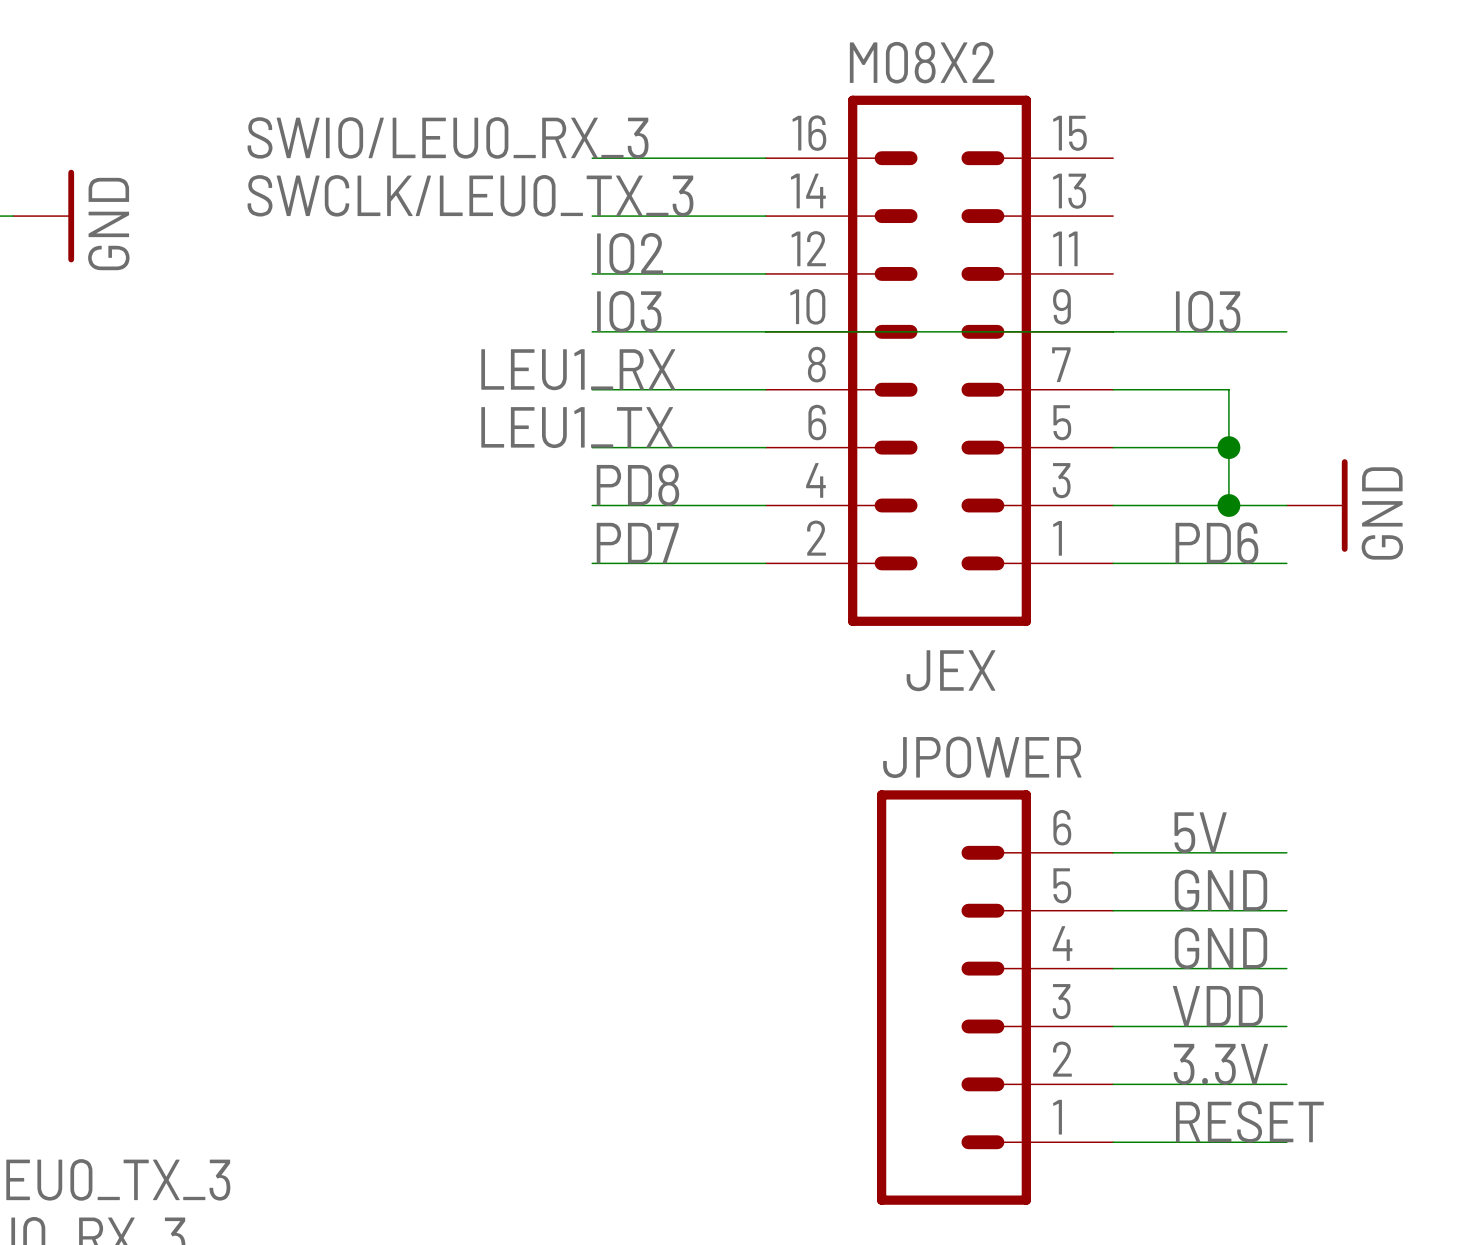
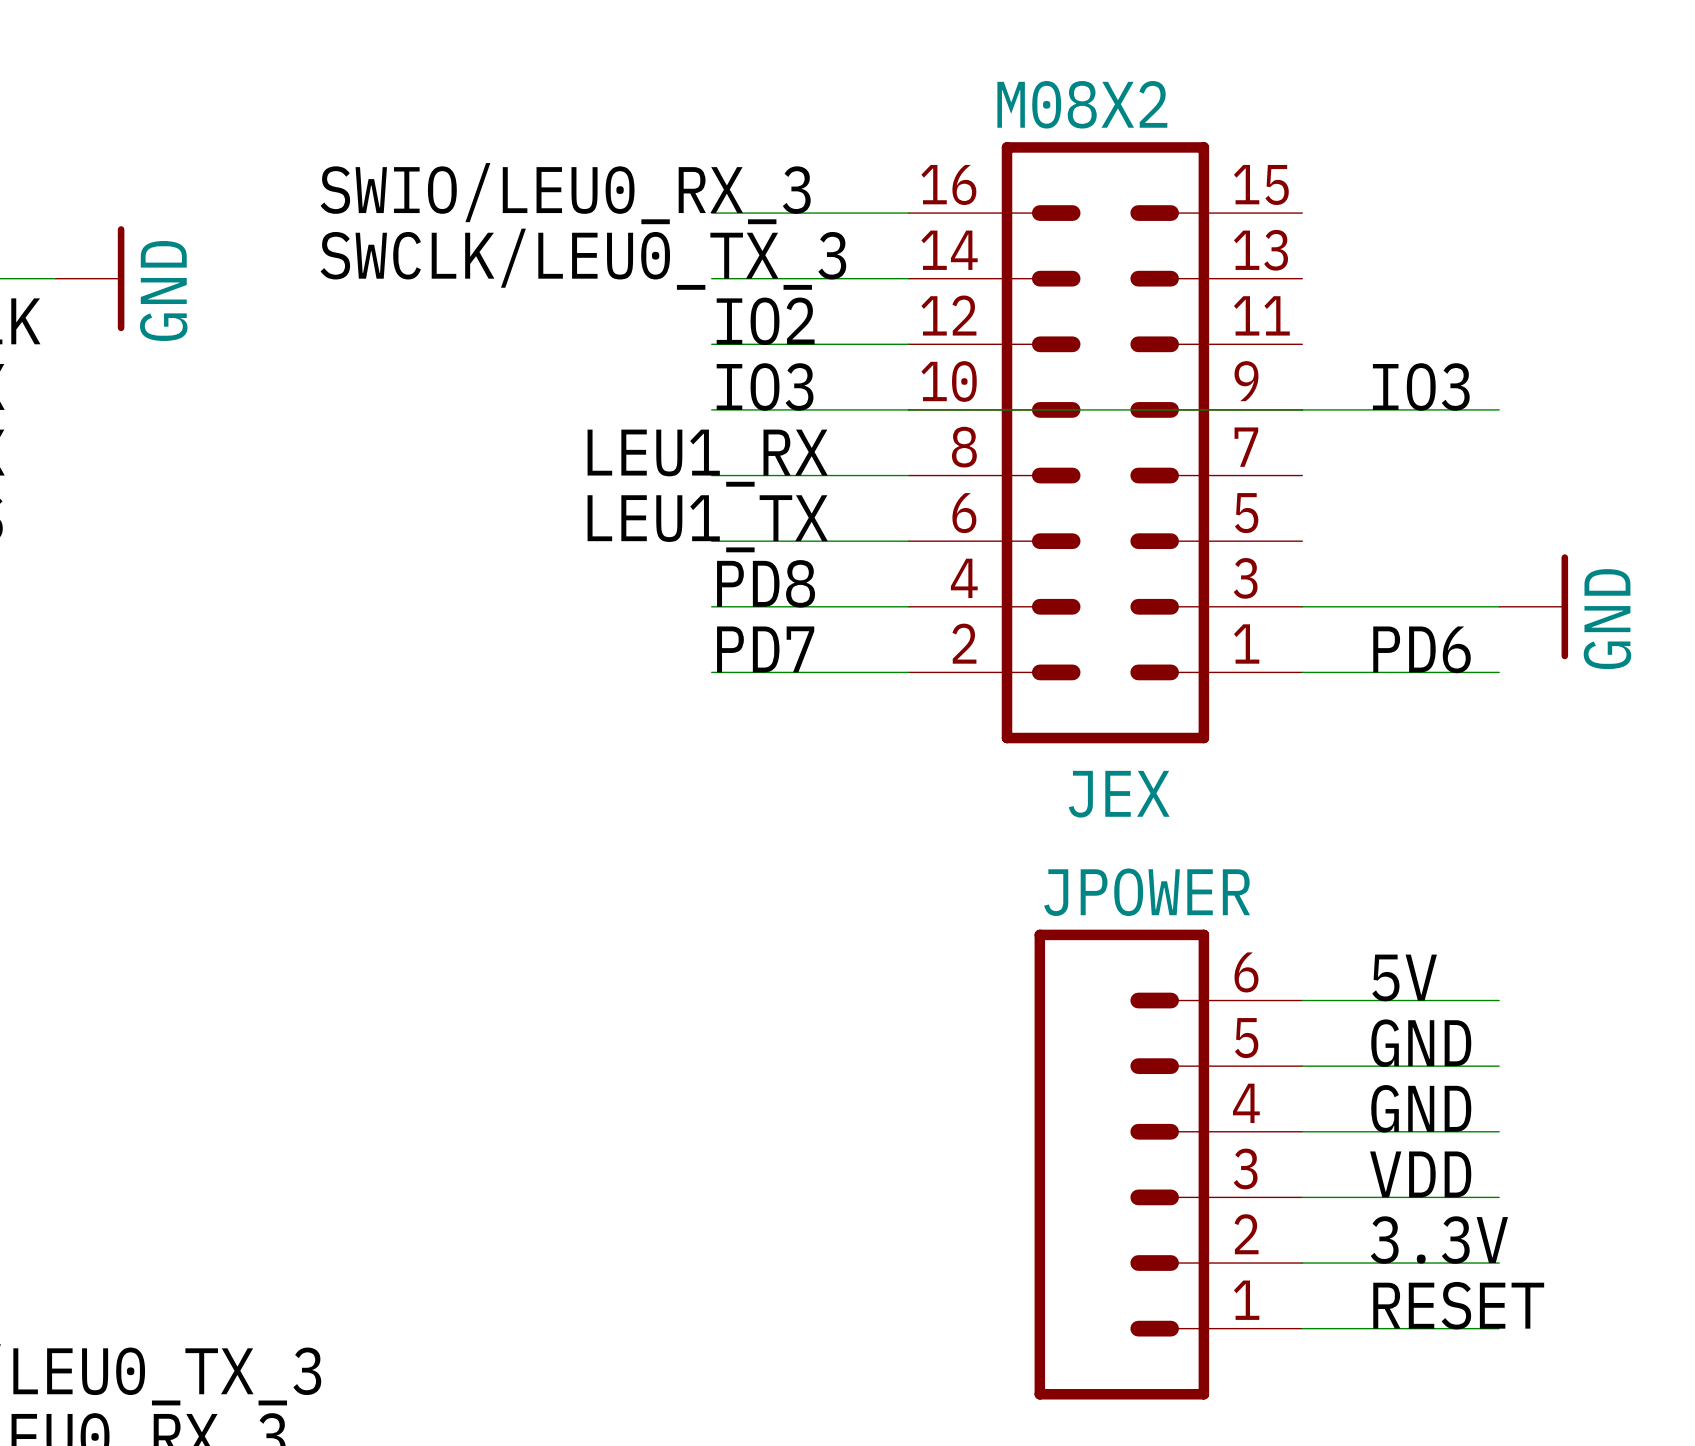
wire: (1113, 389) (1228, 389) (1228, 505) -> none
wire: (1113, 447) (1228, 447) -> none
junction: (1228, 447) -> none
junction: (1228, 505) -> none

